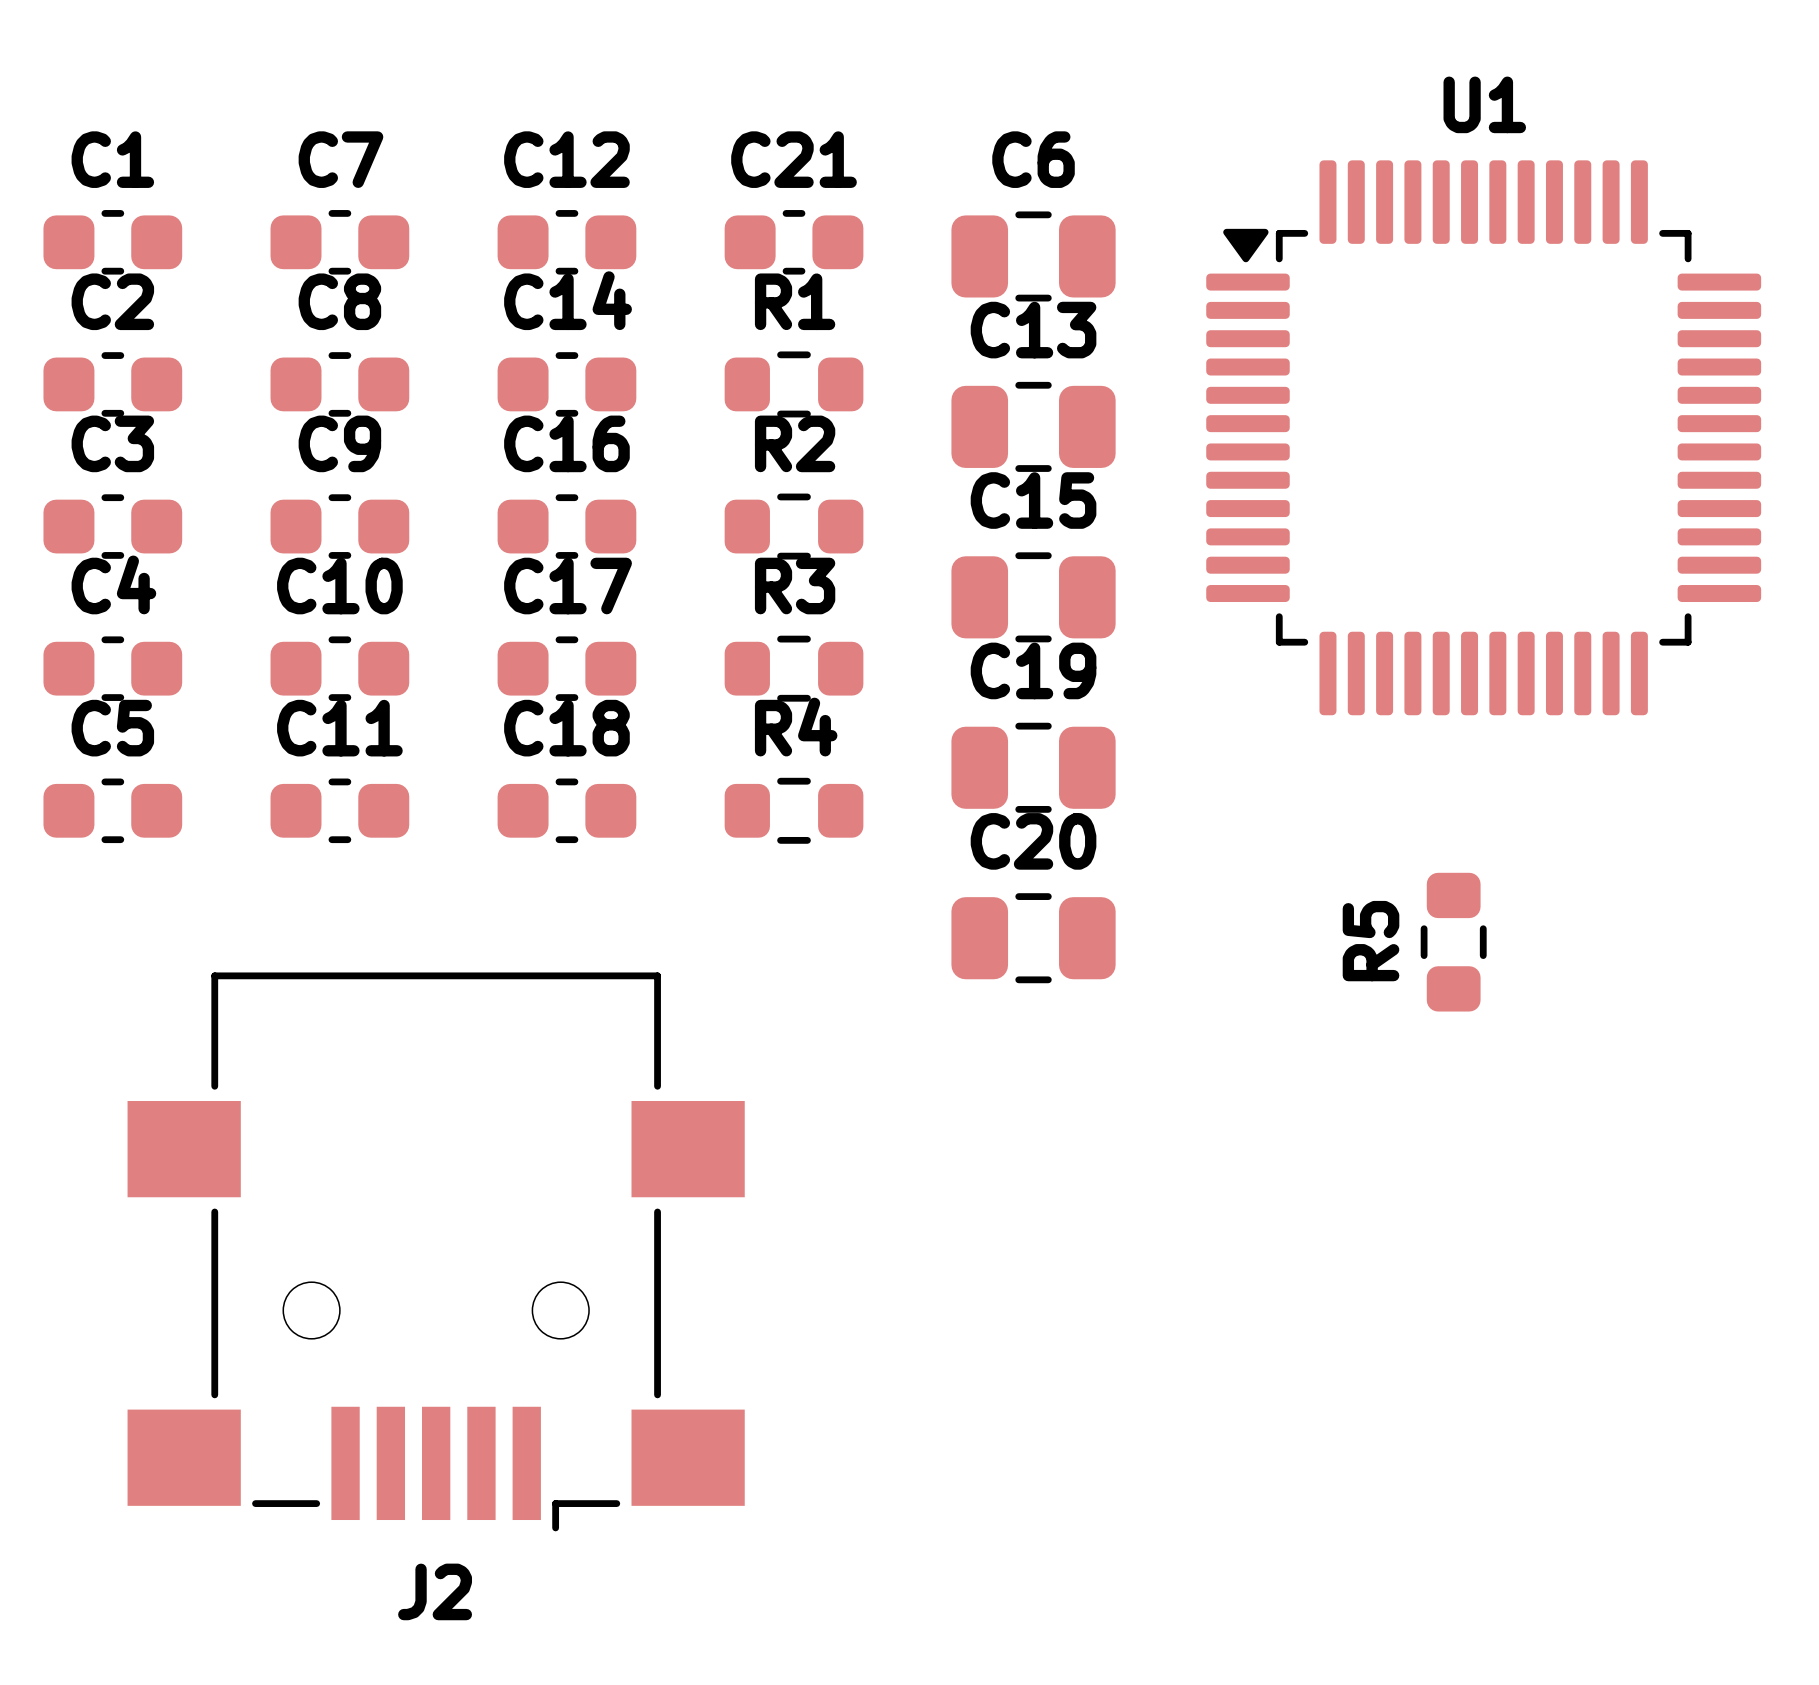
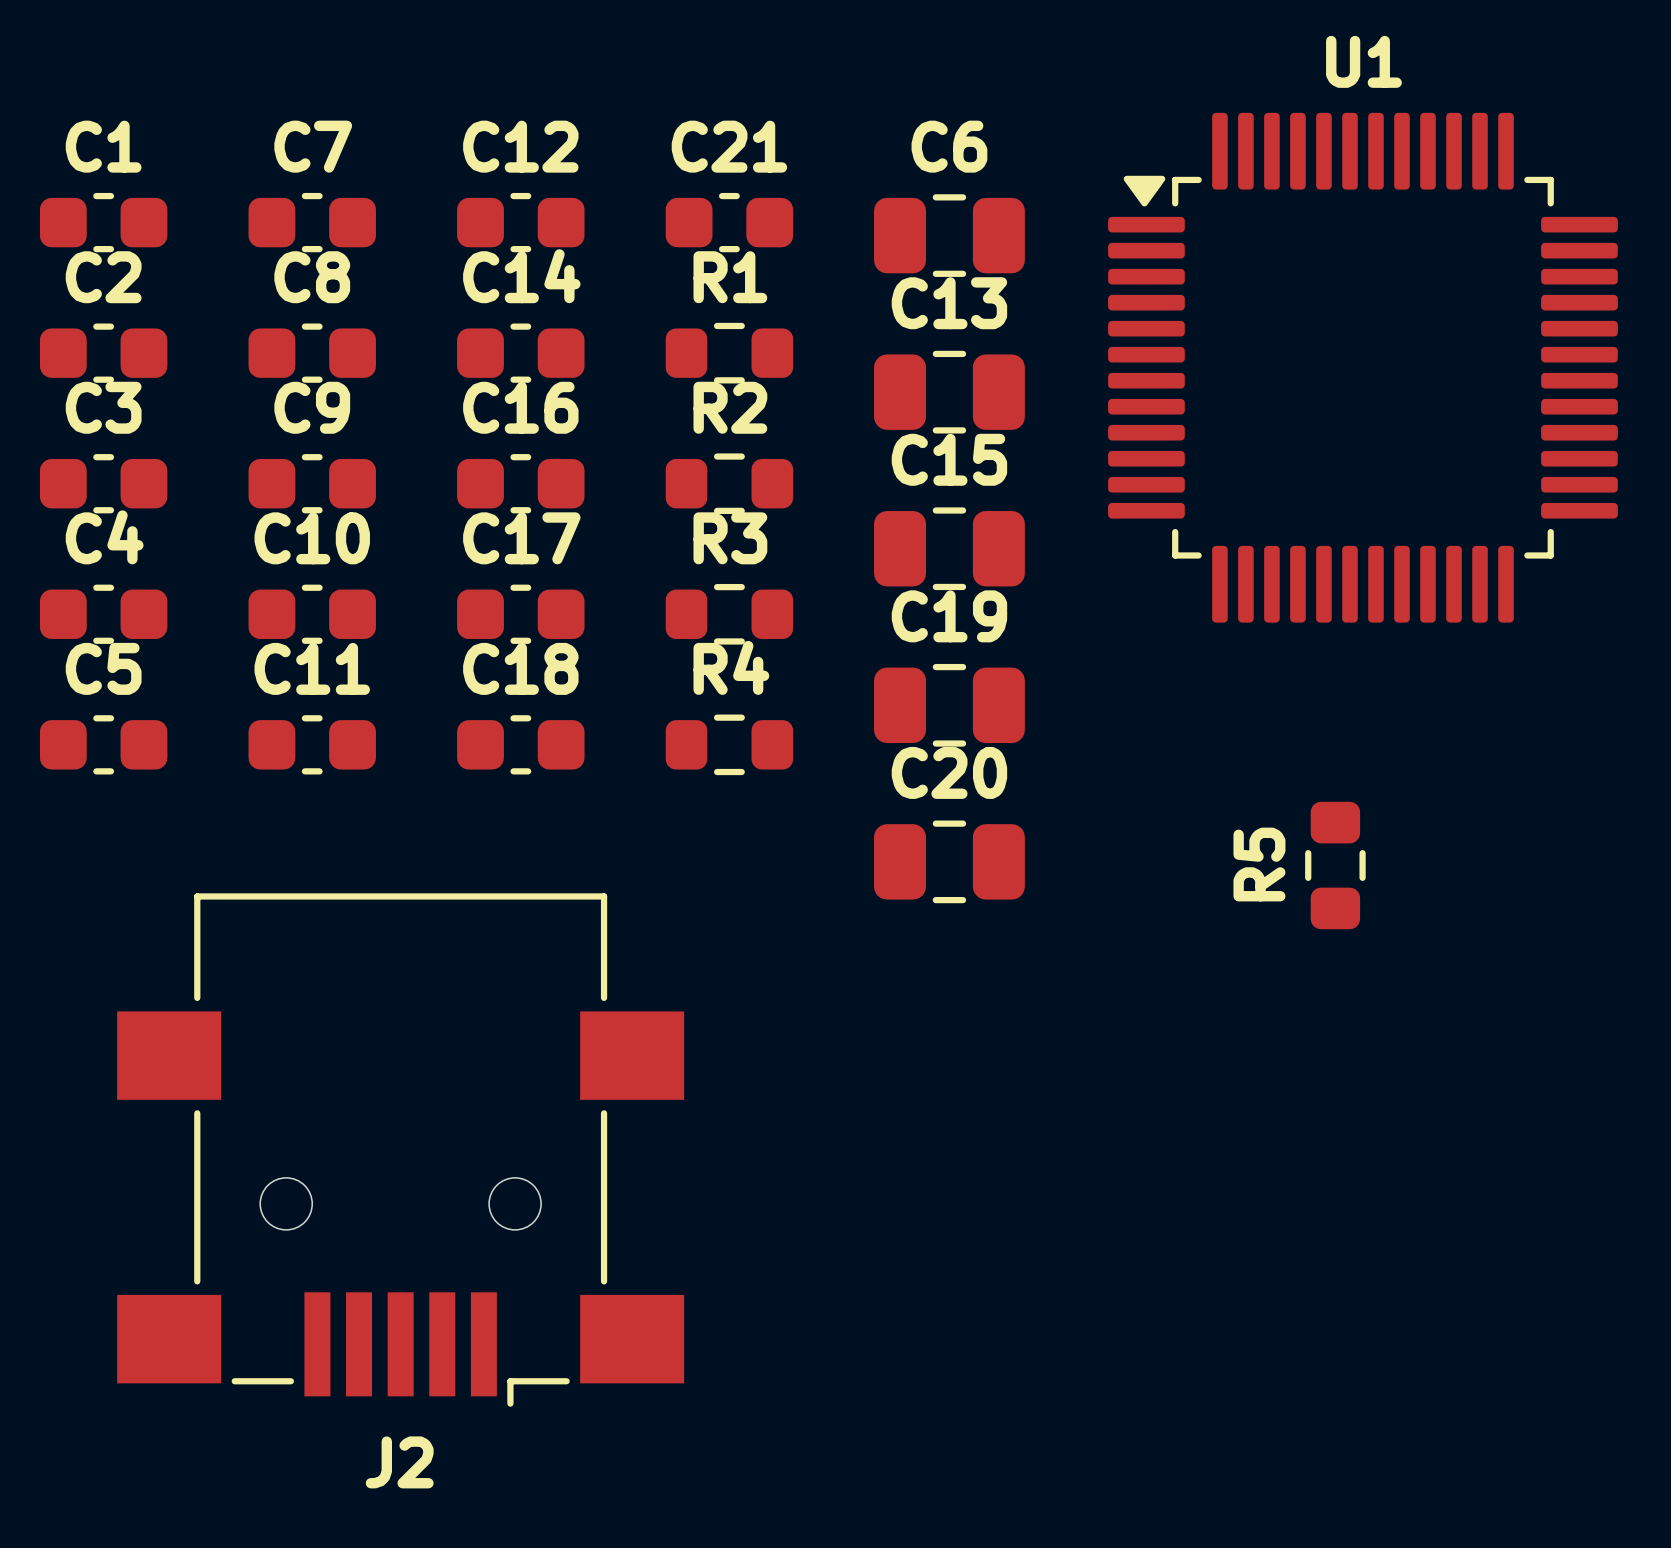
U1 position: (1483, 437) -> (1362, 367)

